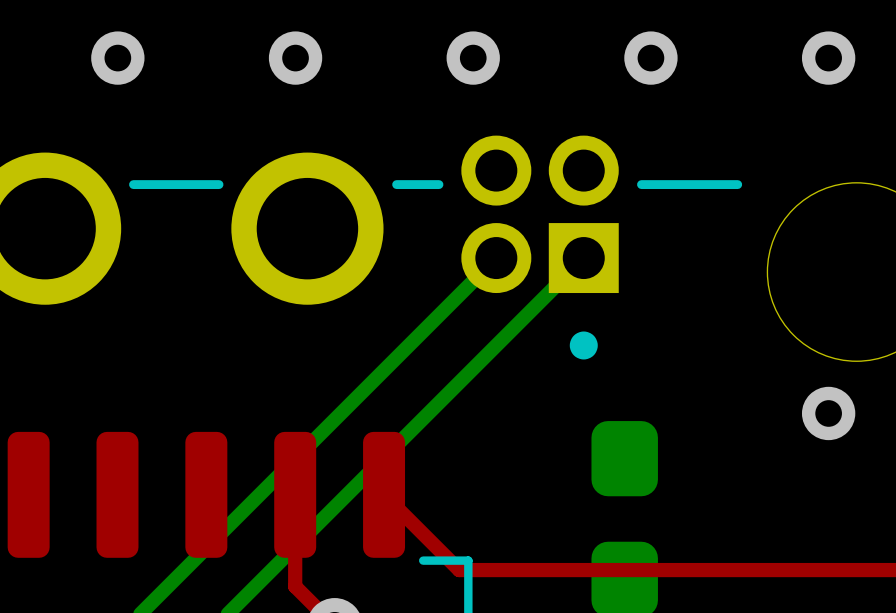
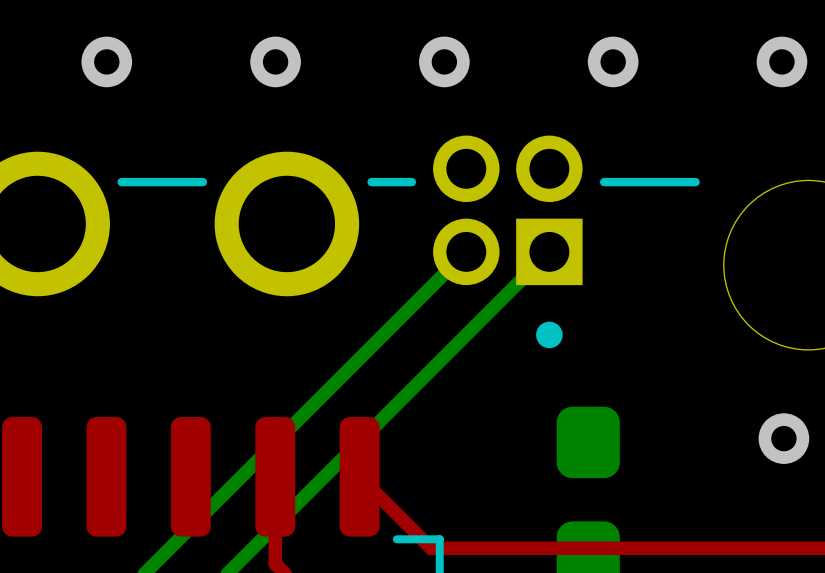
via position: (828, 413) -> (783, 438)

